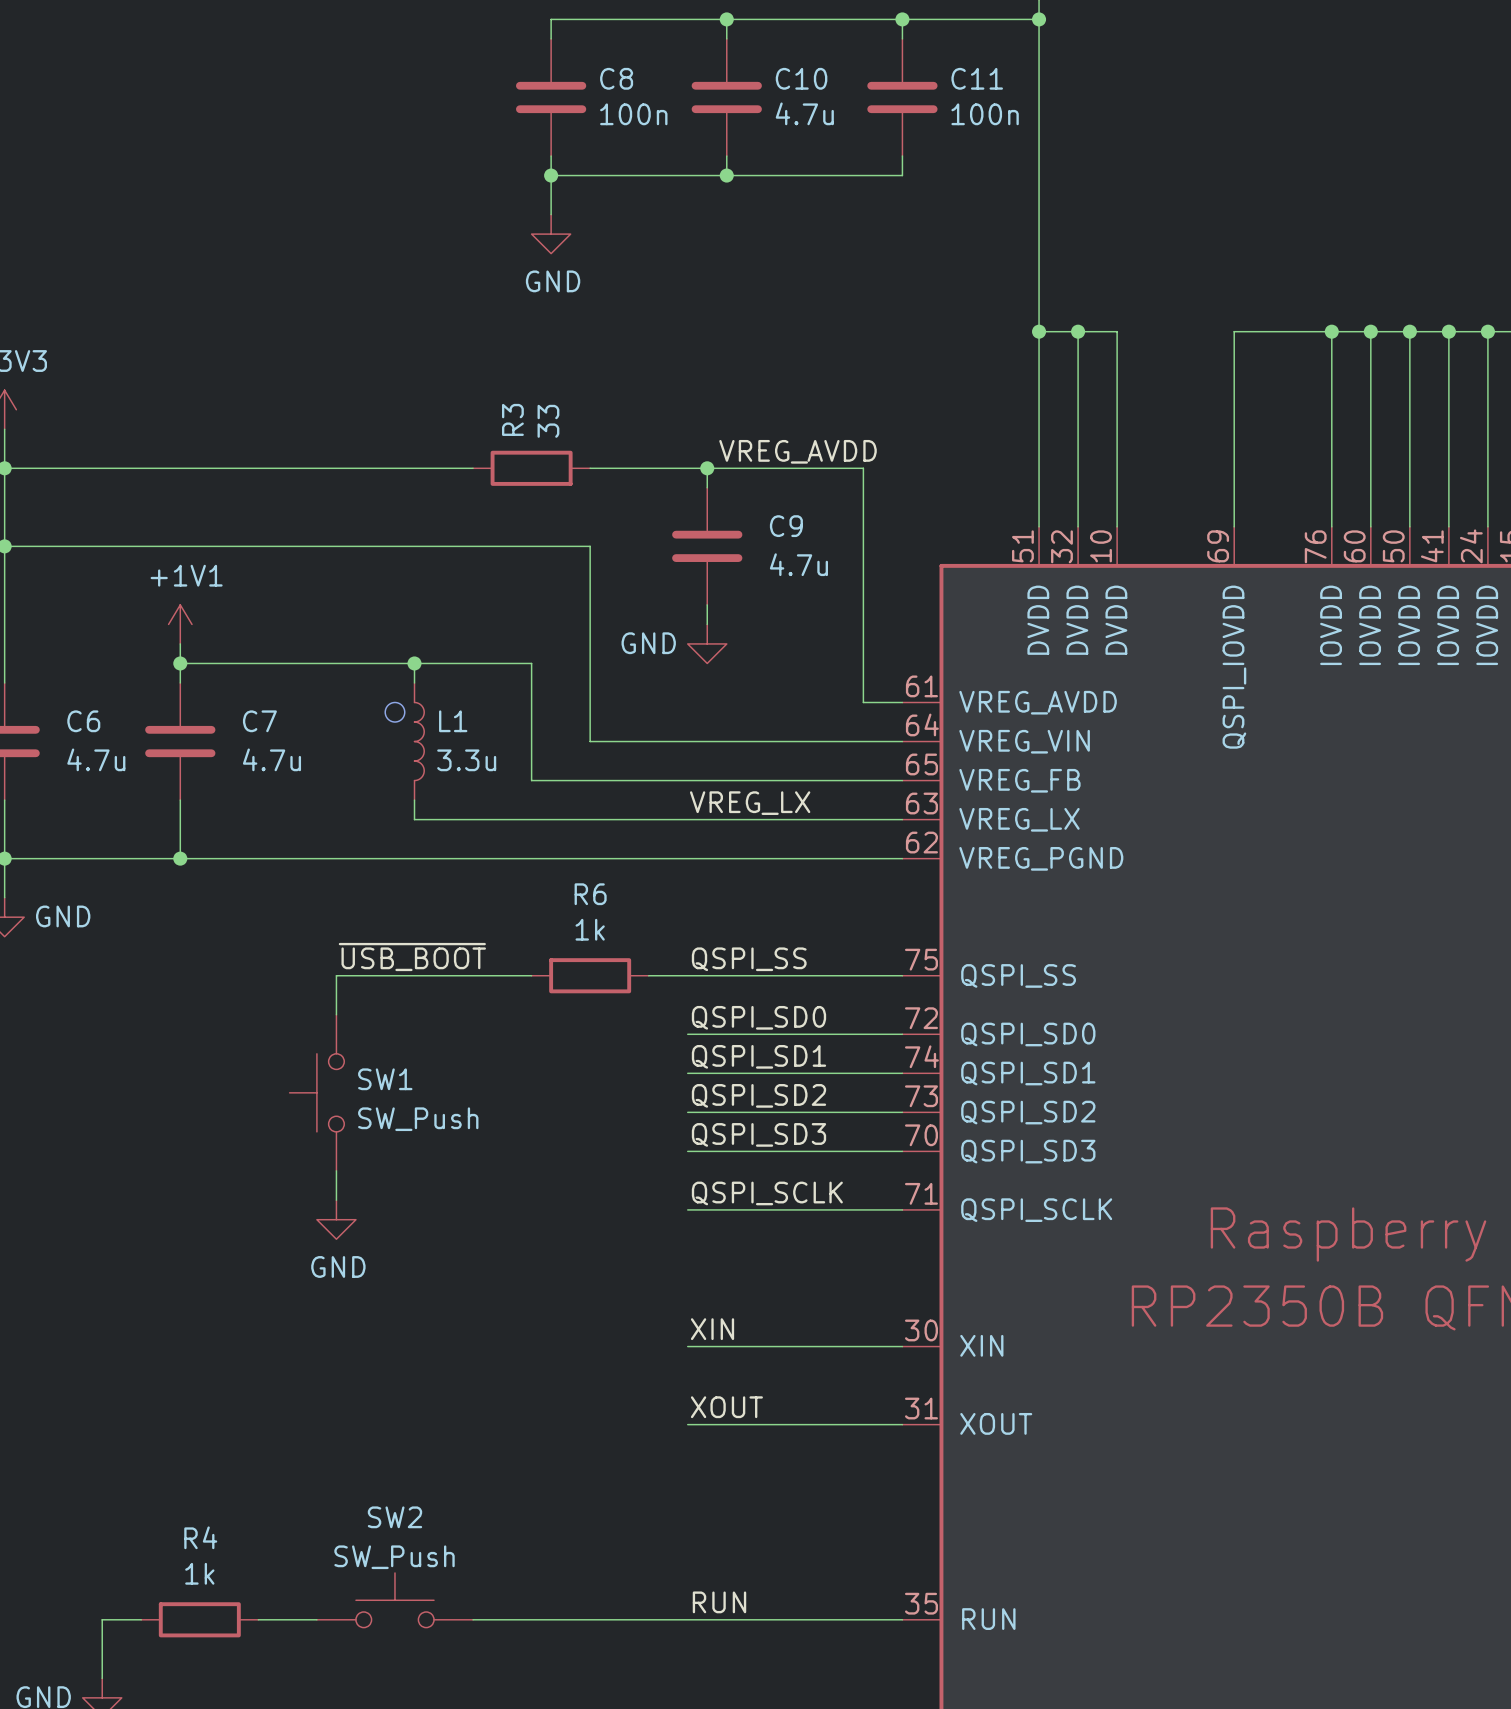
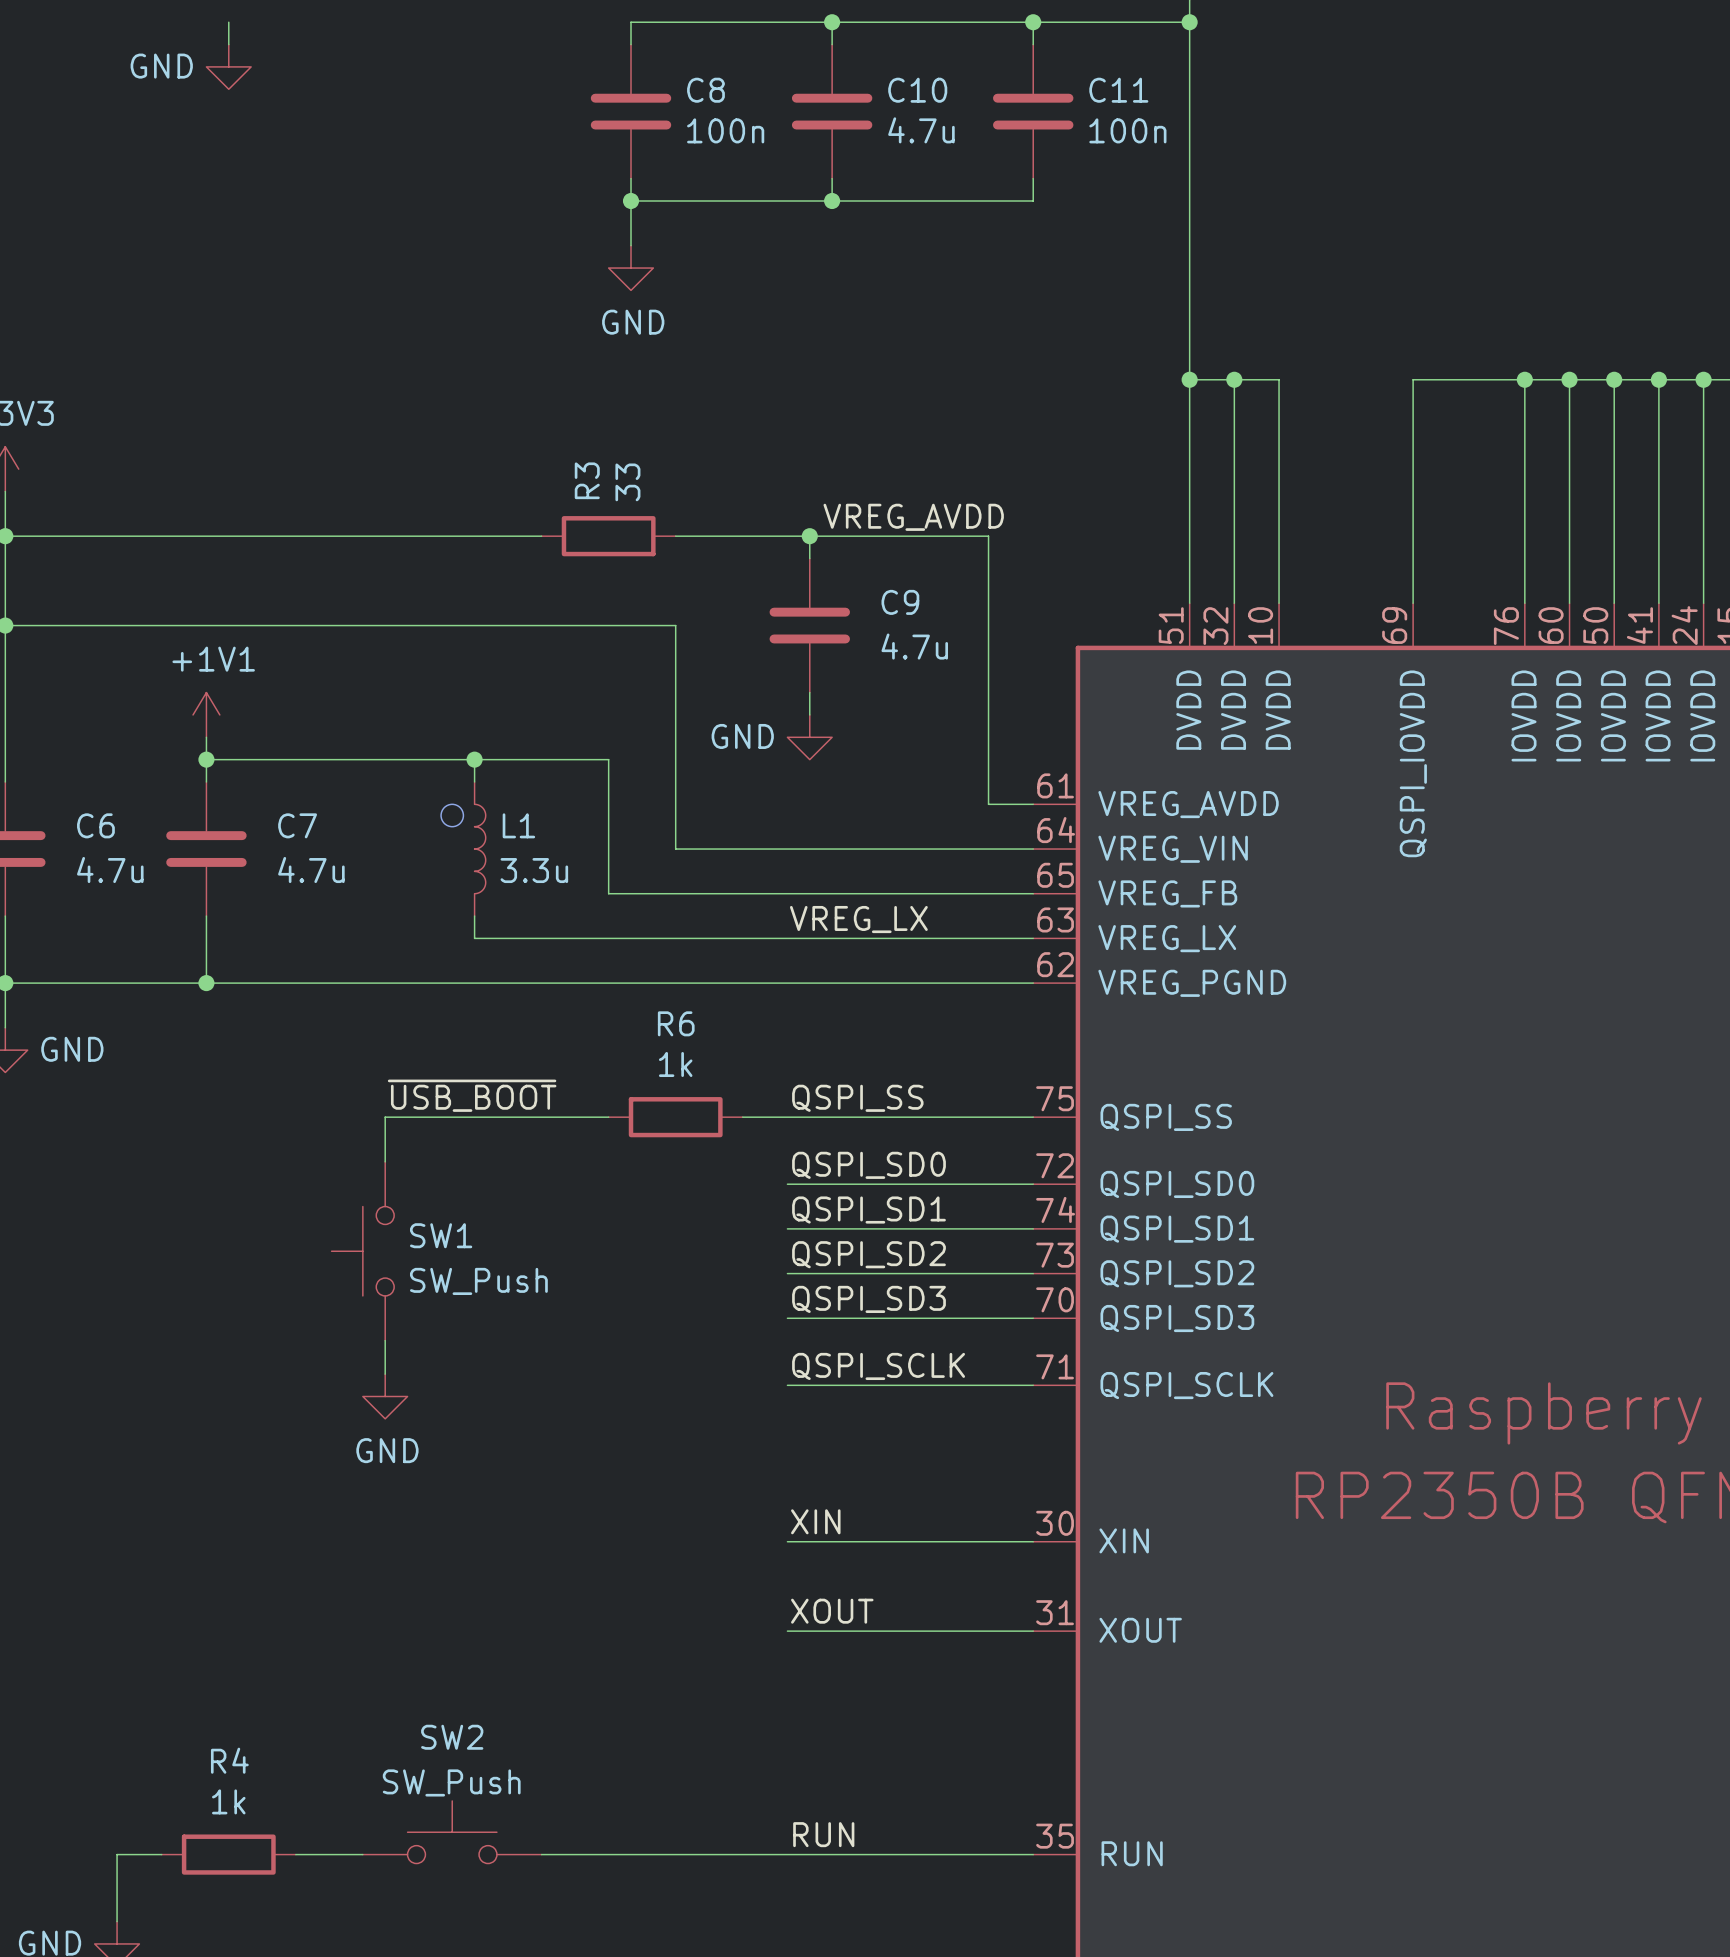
wire: none -> (228, 22) (228, 44)
power symbol: none -> GND (228, 66)

